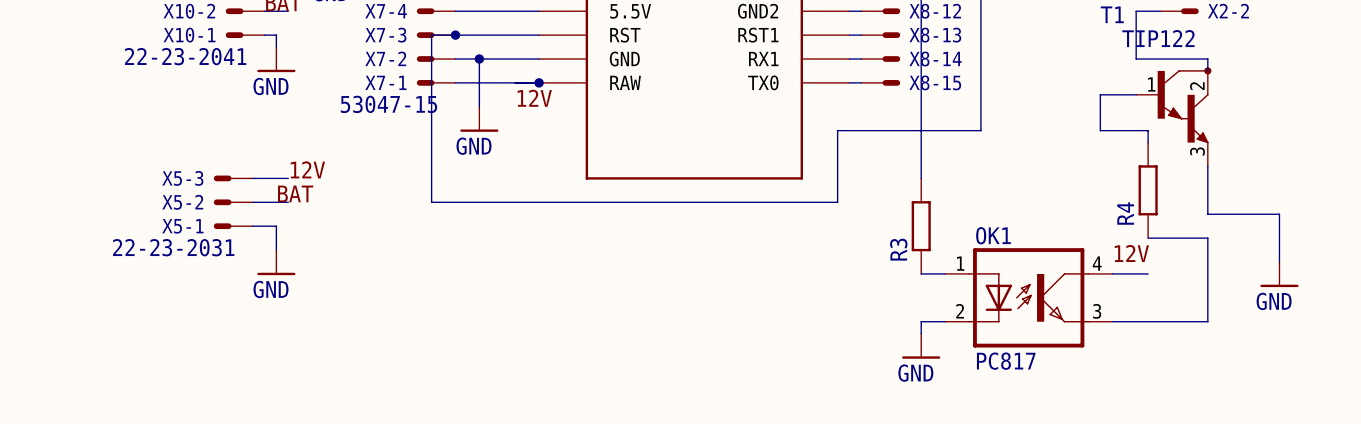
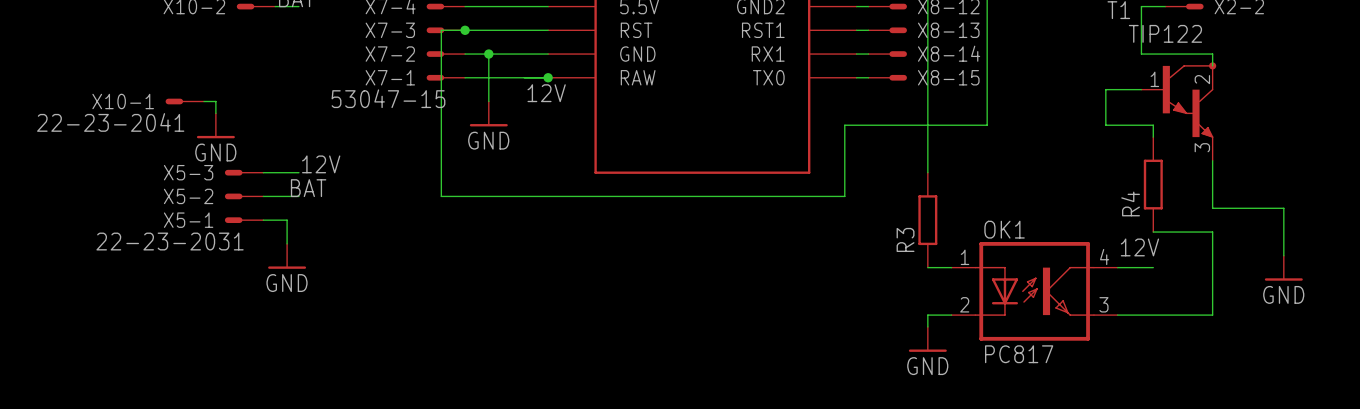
X10-1 position: (245, 35) -> (184, 101)
wire: (264, 35) (276, 35) (276, 47) -> (204, 101) (215, 101) (215, 113)
power symbol position: GND (276, 59) -> GND (215, 125)

